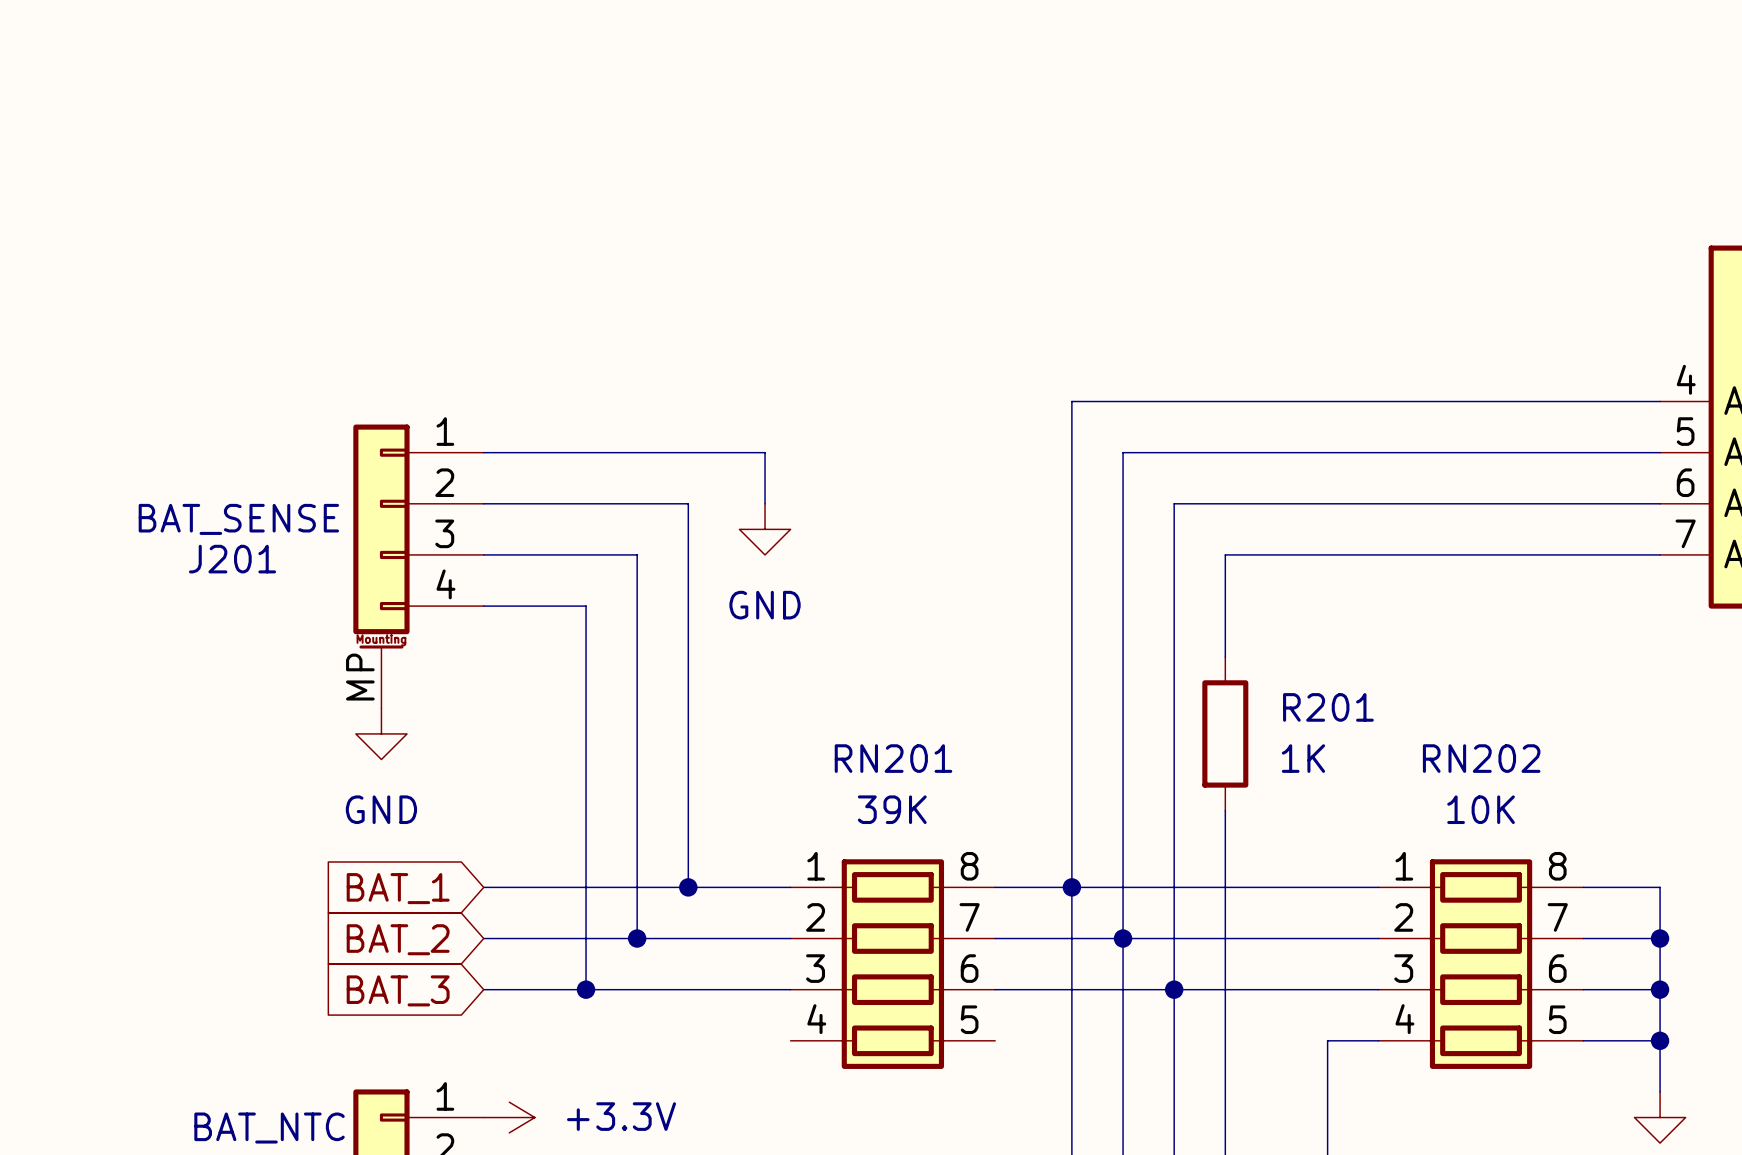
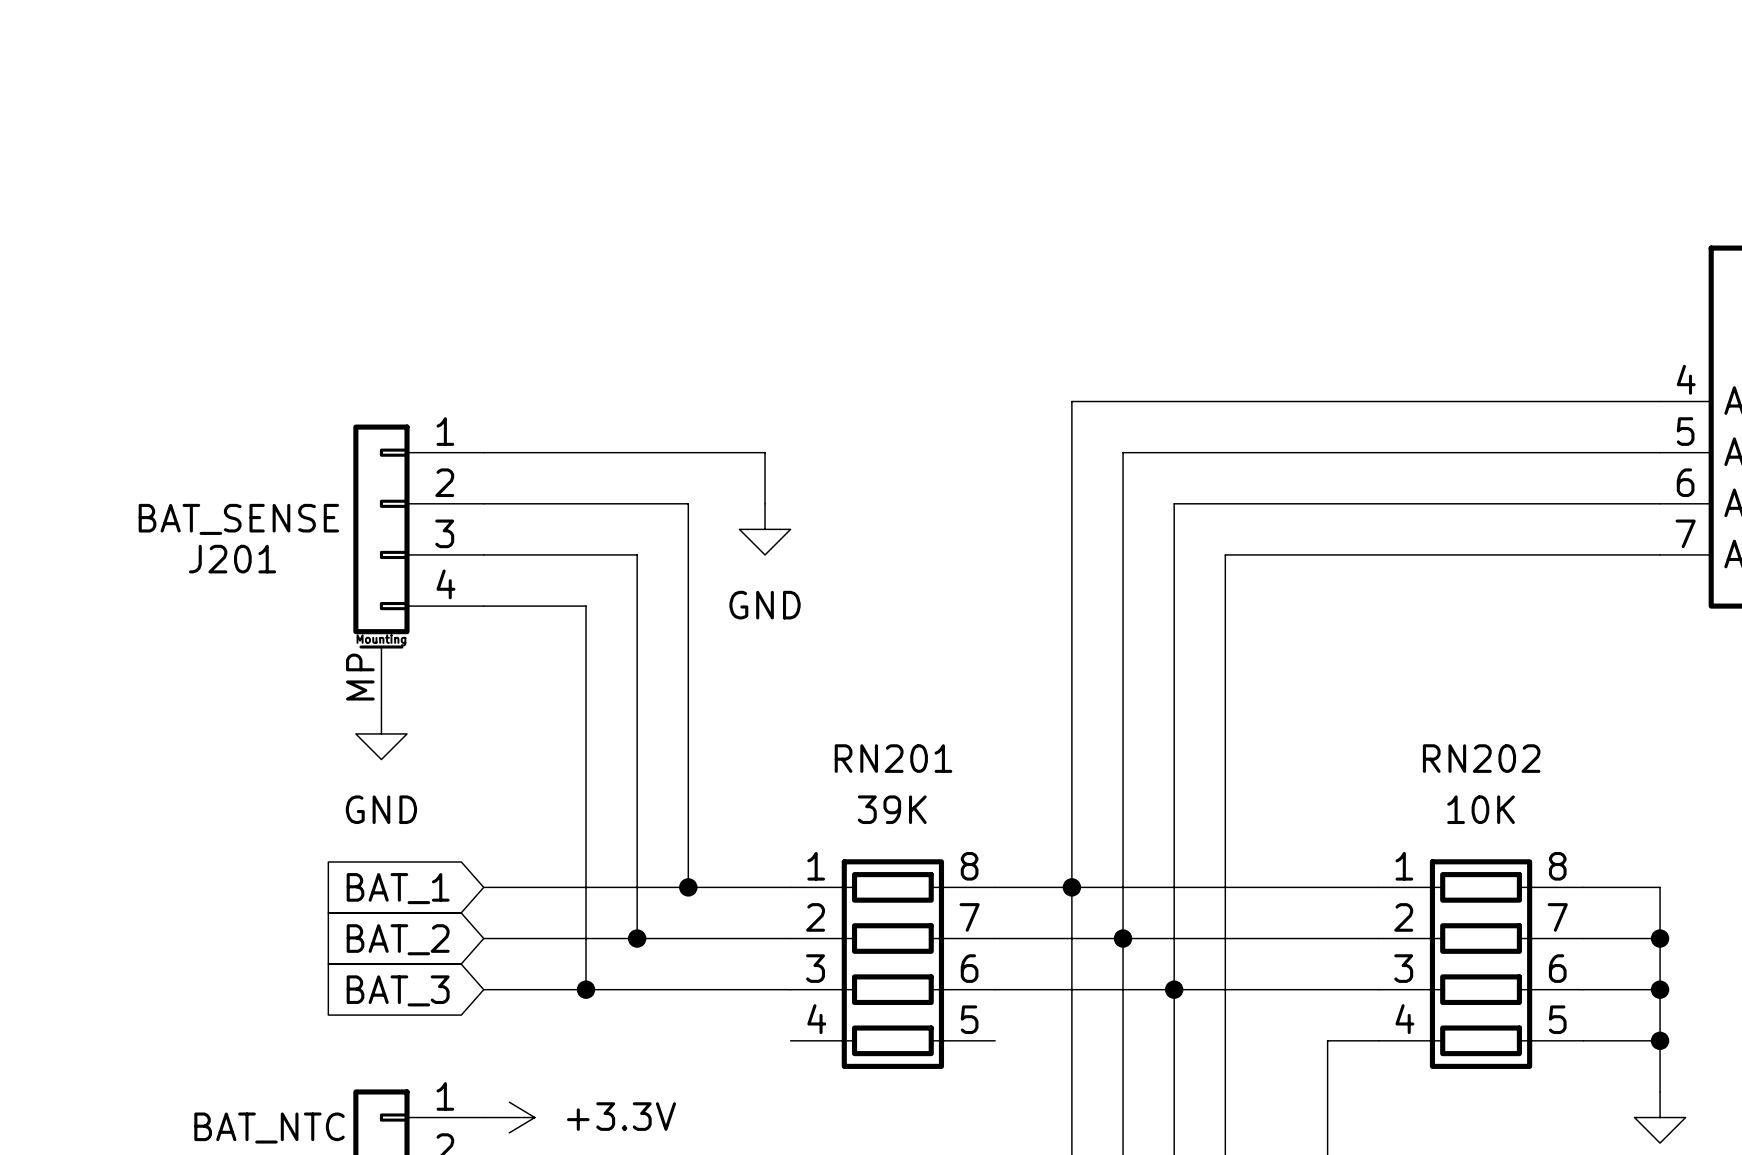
wire: none -> (1225, 657) (1225, 810)
R201: 1K (1225, 733) -> none

